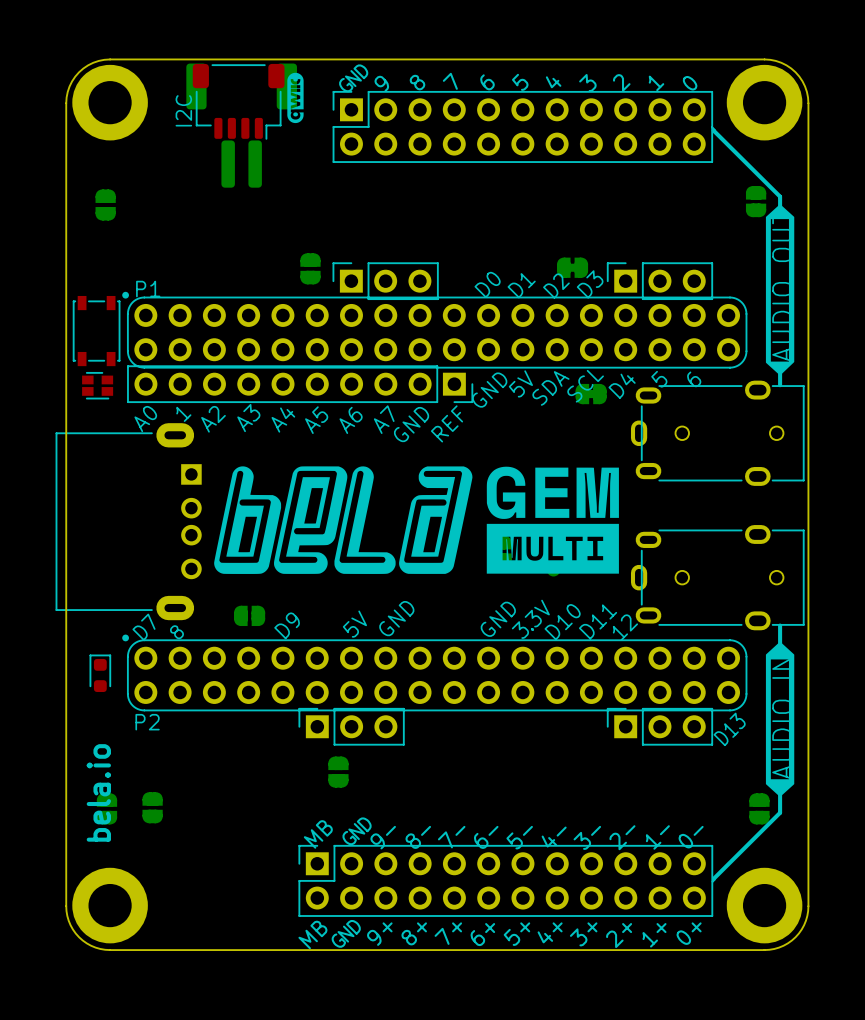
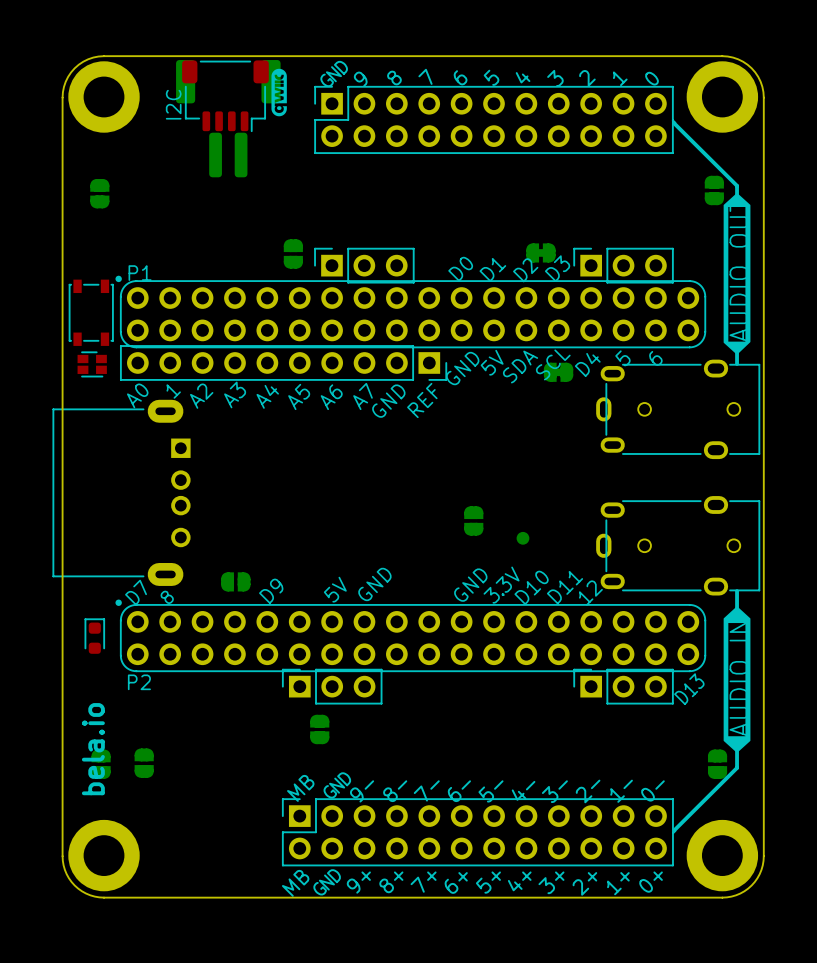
drawing: [214, 466, 619, 574] -> none

